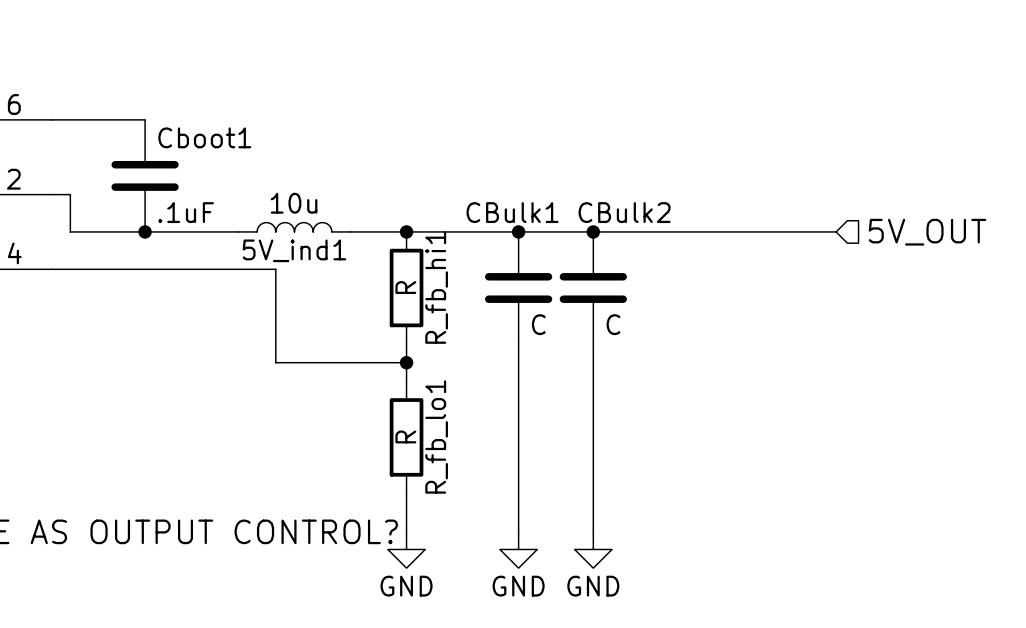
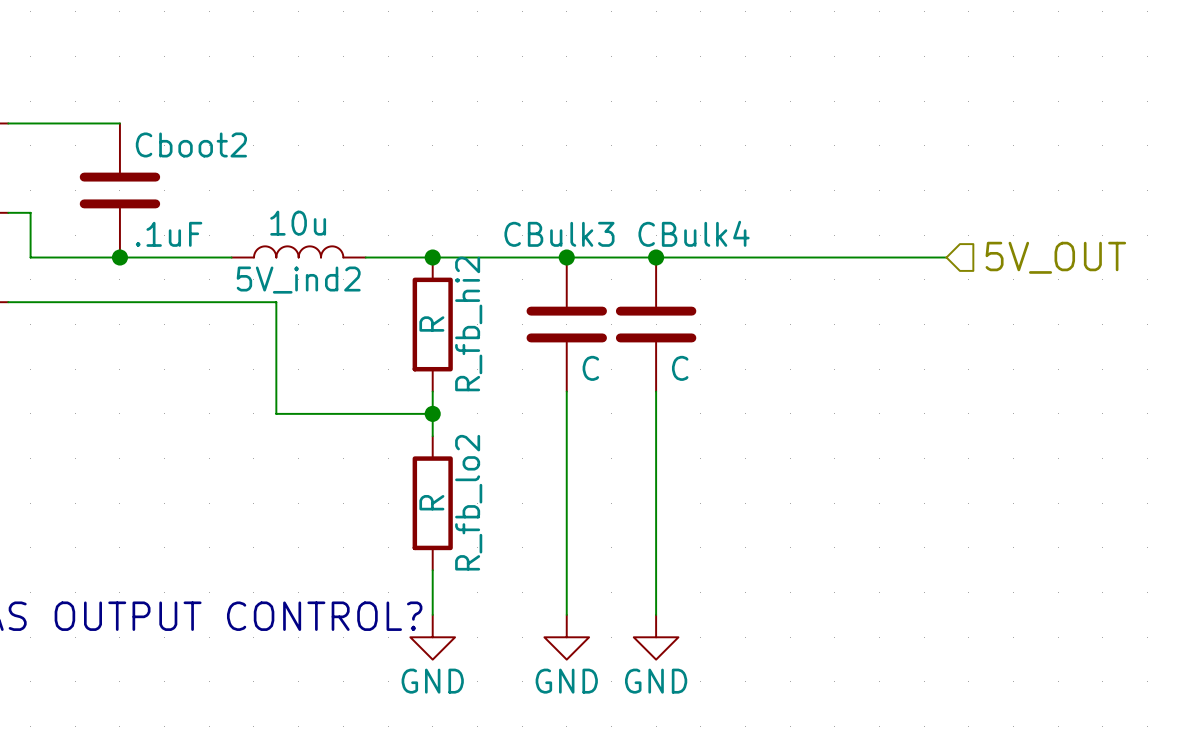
Cboot1 name: Cboot1 (204, 137) -> Cboot2 (191, 144)
CBulk1 name: CBulk1 (512, 212) -> CBulk3 (559, 234)
CBulk2 name: CBulk2 (624, 212) -> CBulk4 (694, 233)
5V_ind1 name: 5V_ind1 (294, 250) -> 5V_ind2 (298, 280)
R_fb_hi1 name: R_fb_hi1 (436, 287) -> R_fb_hi2 (468, 323)
R_fb_lo1 name: R_fb_lo1 (436, 436) -> R_fb_lo2 (468, 502)

